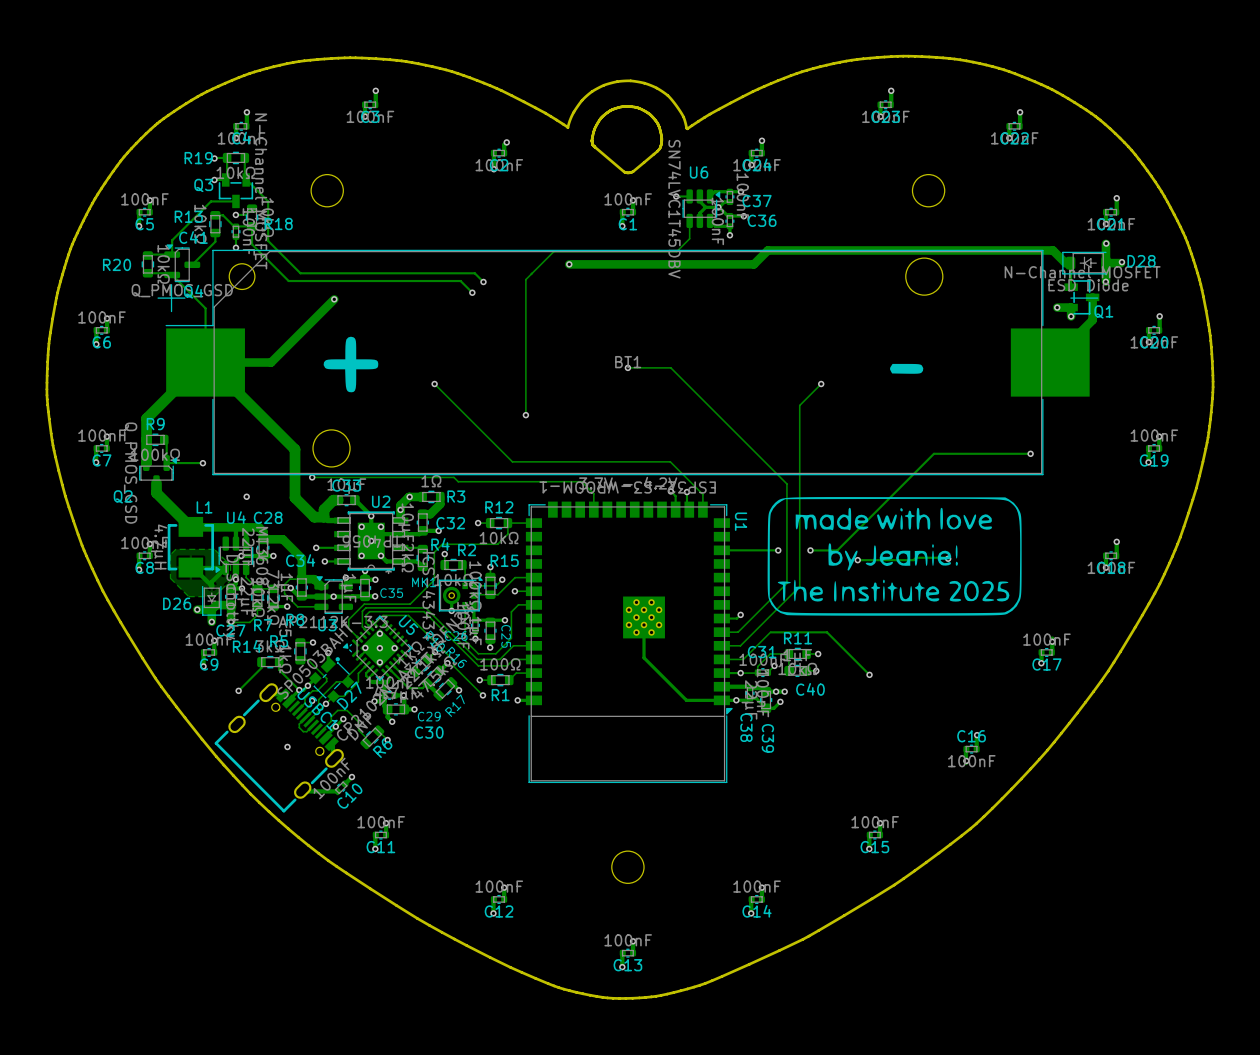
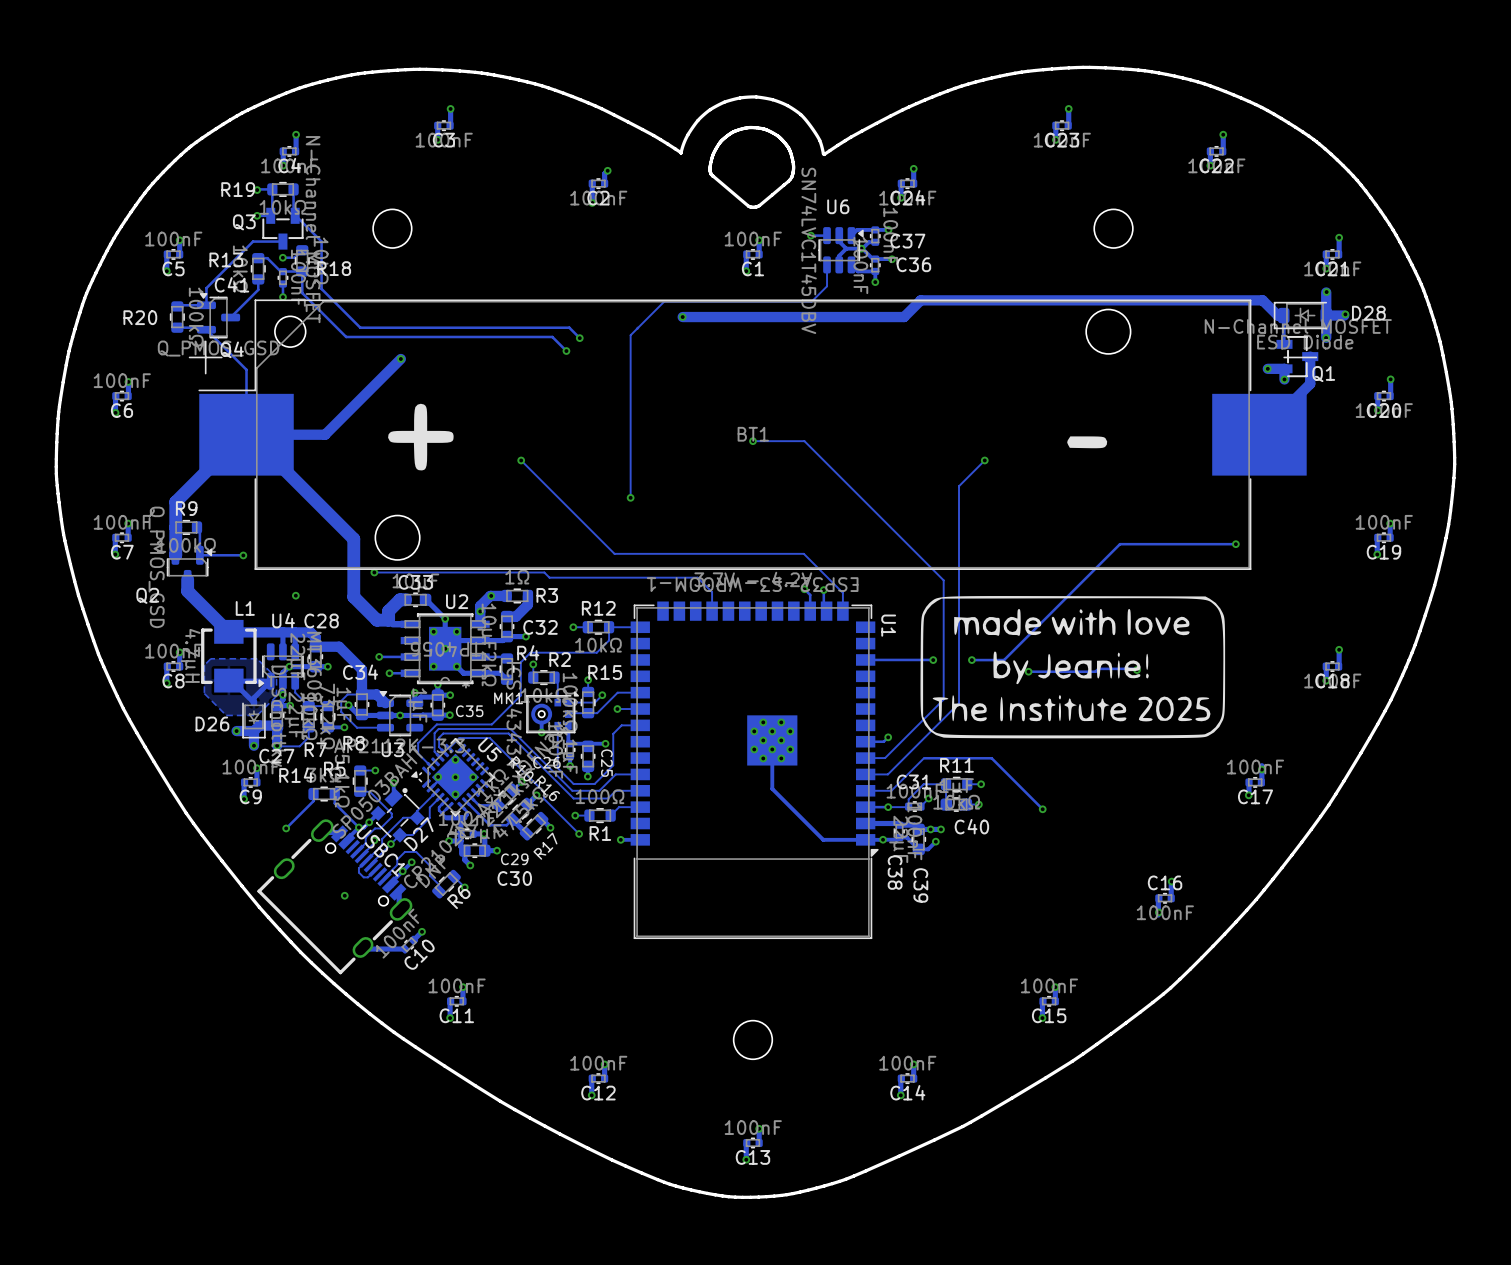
R20 value: 10kΩ (163, 264) -> 100kΩ (196, 317)

